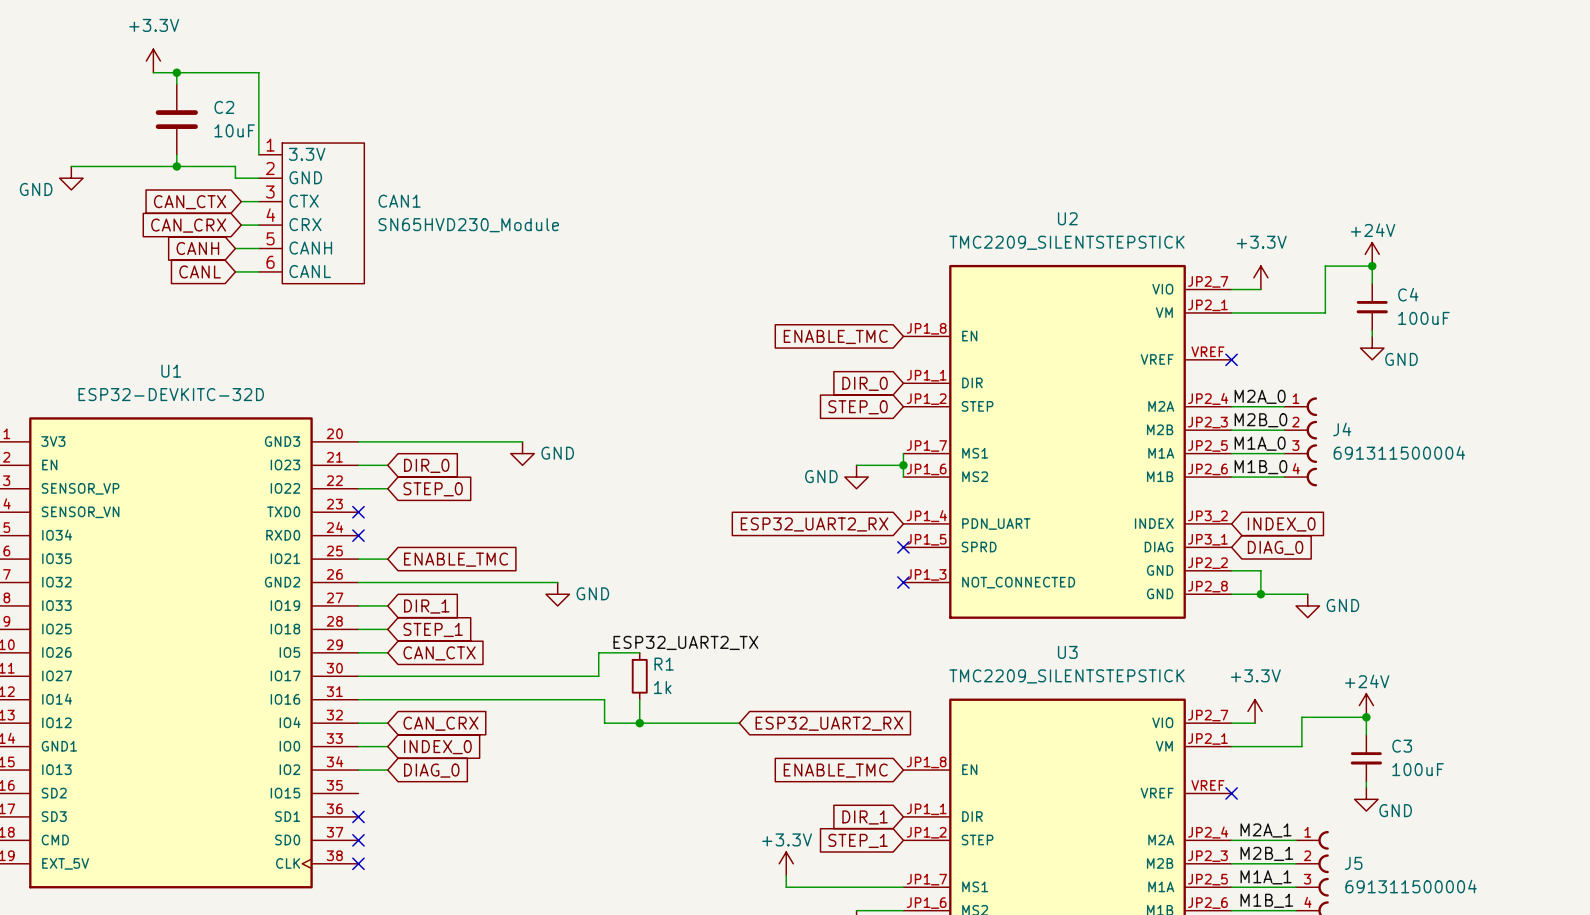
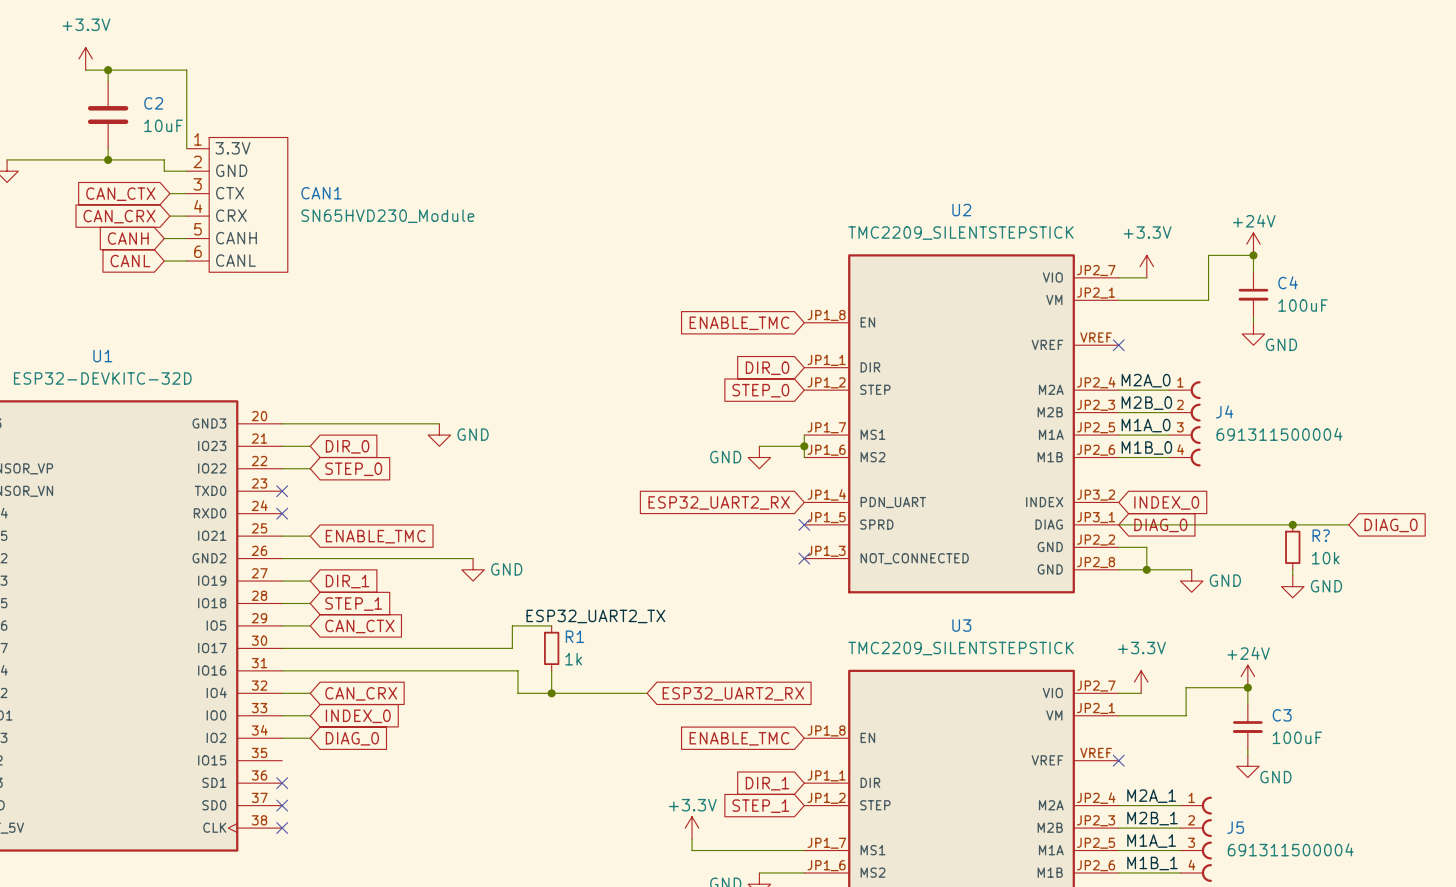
wire: none -> (1118, 524) (1348, 524)
junction: none -> (1292, 524)
global label: none -> DIAG_0 (1391, 525)
R?: none -> 10k (1292, 547)
wire: none -> (1292, 569) (1292, 575)
power symbol: none -> GND (1292, 586)

